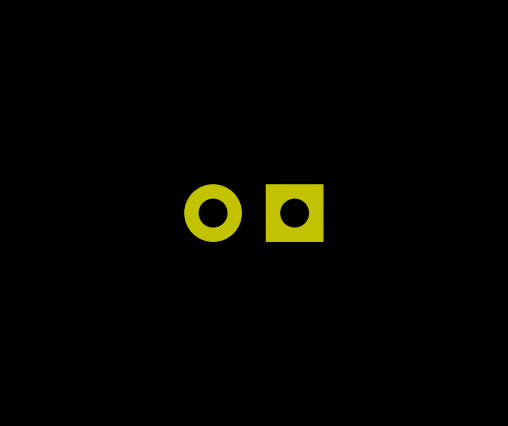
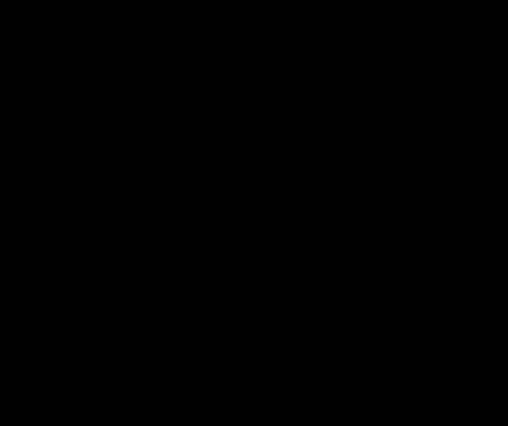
part: (253, 213) -> none

